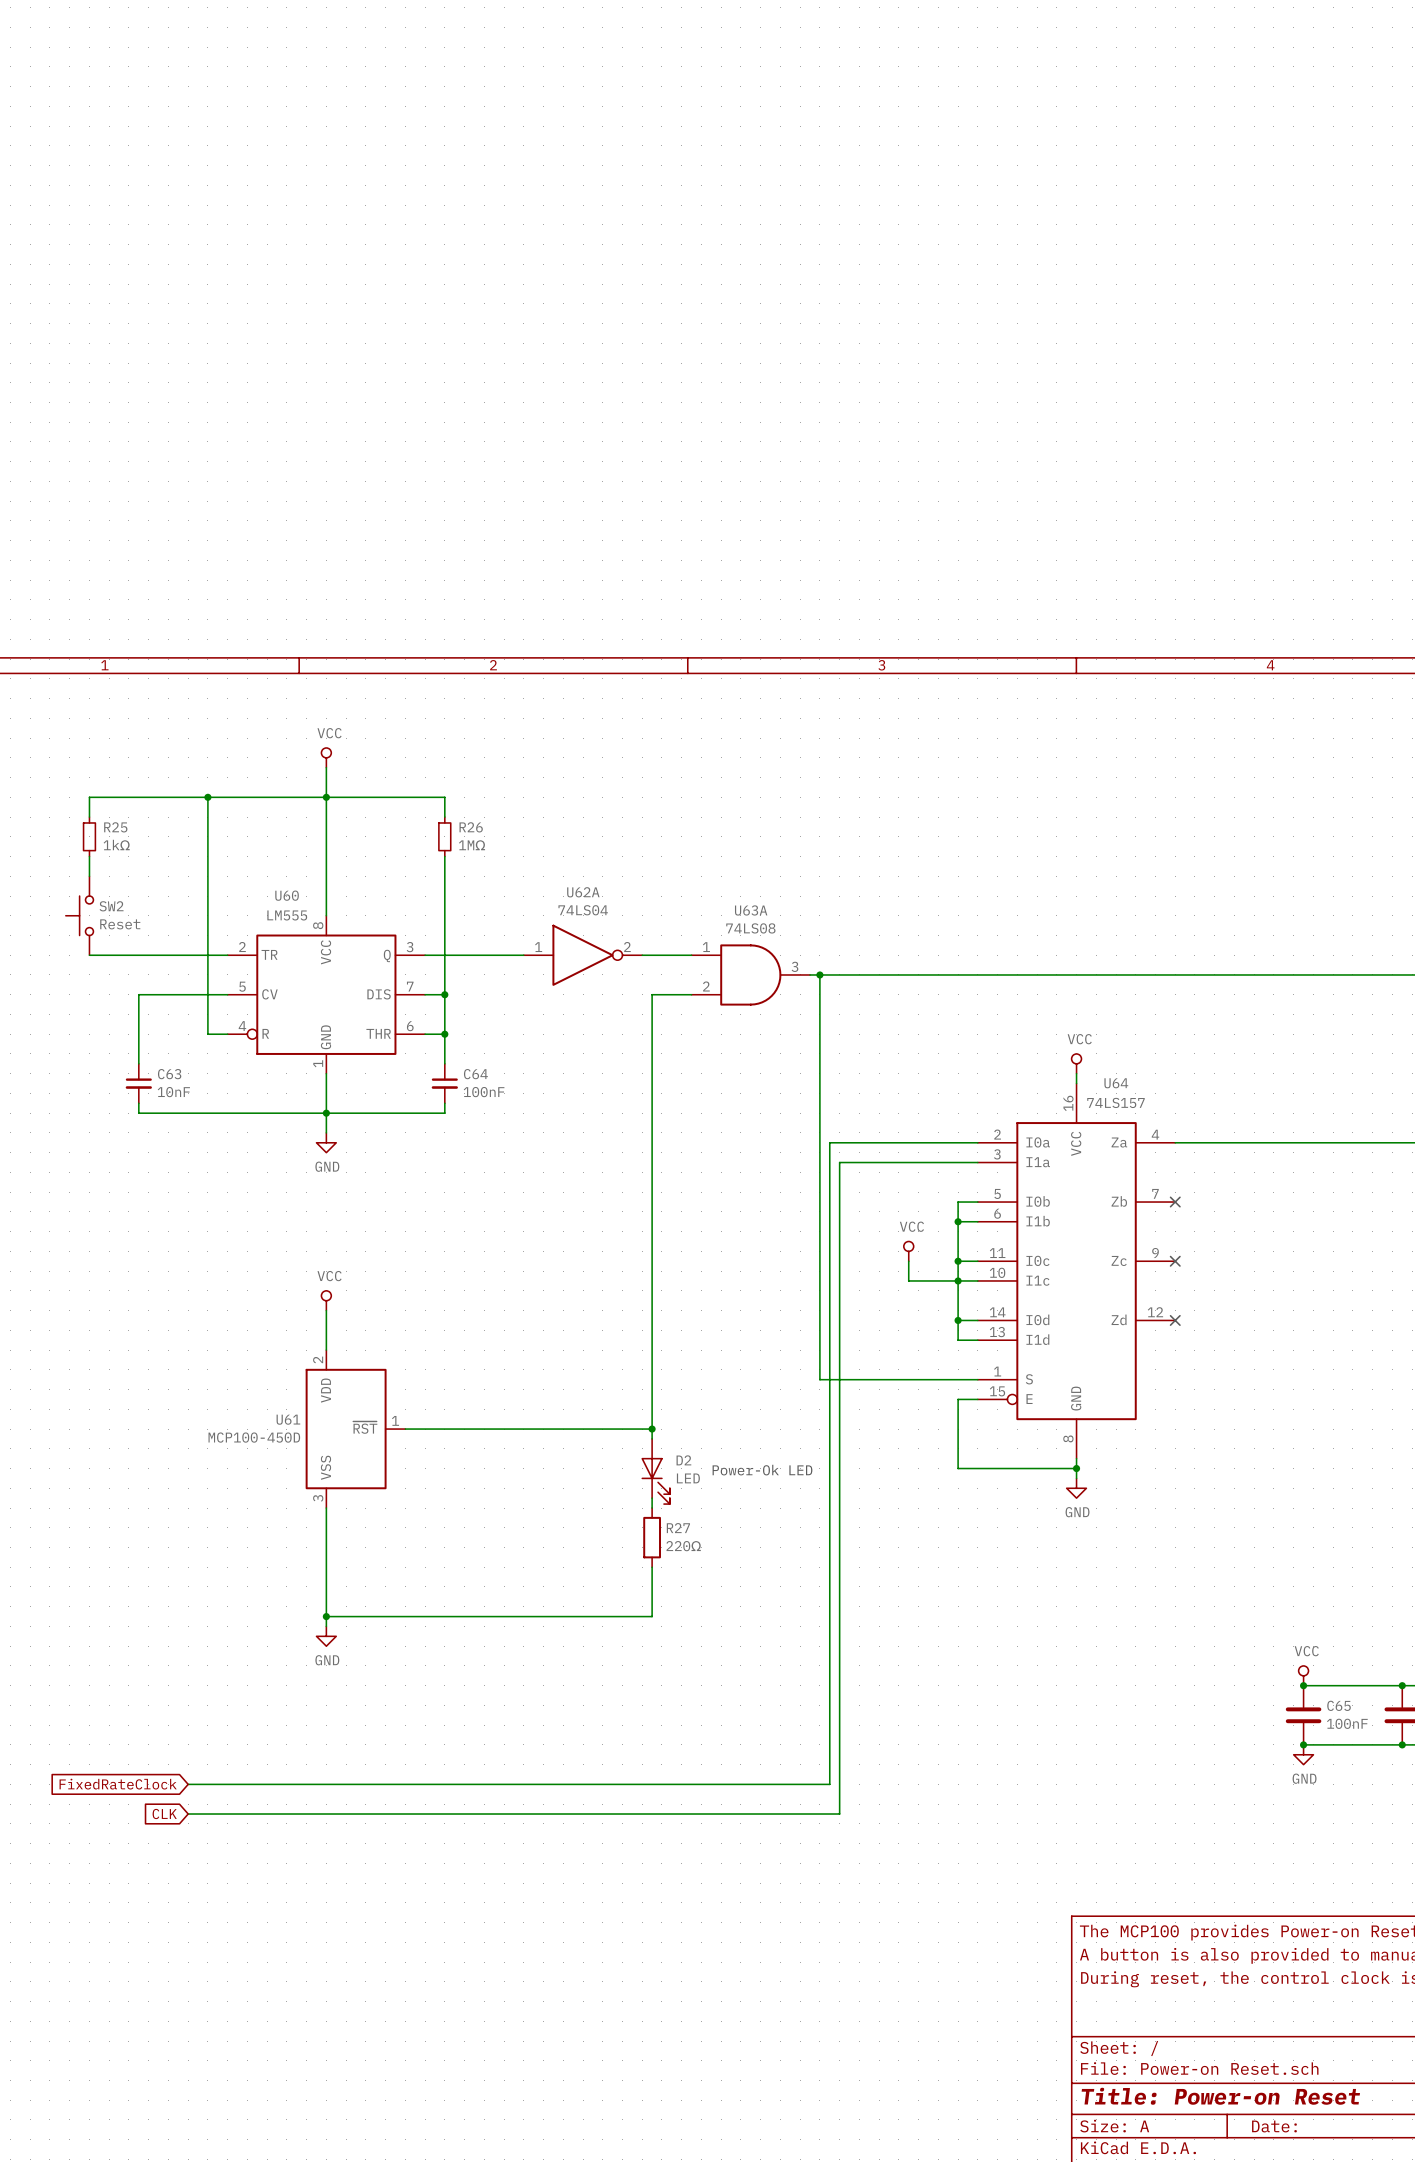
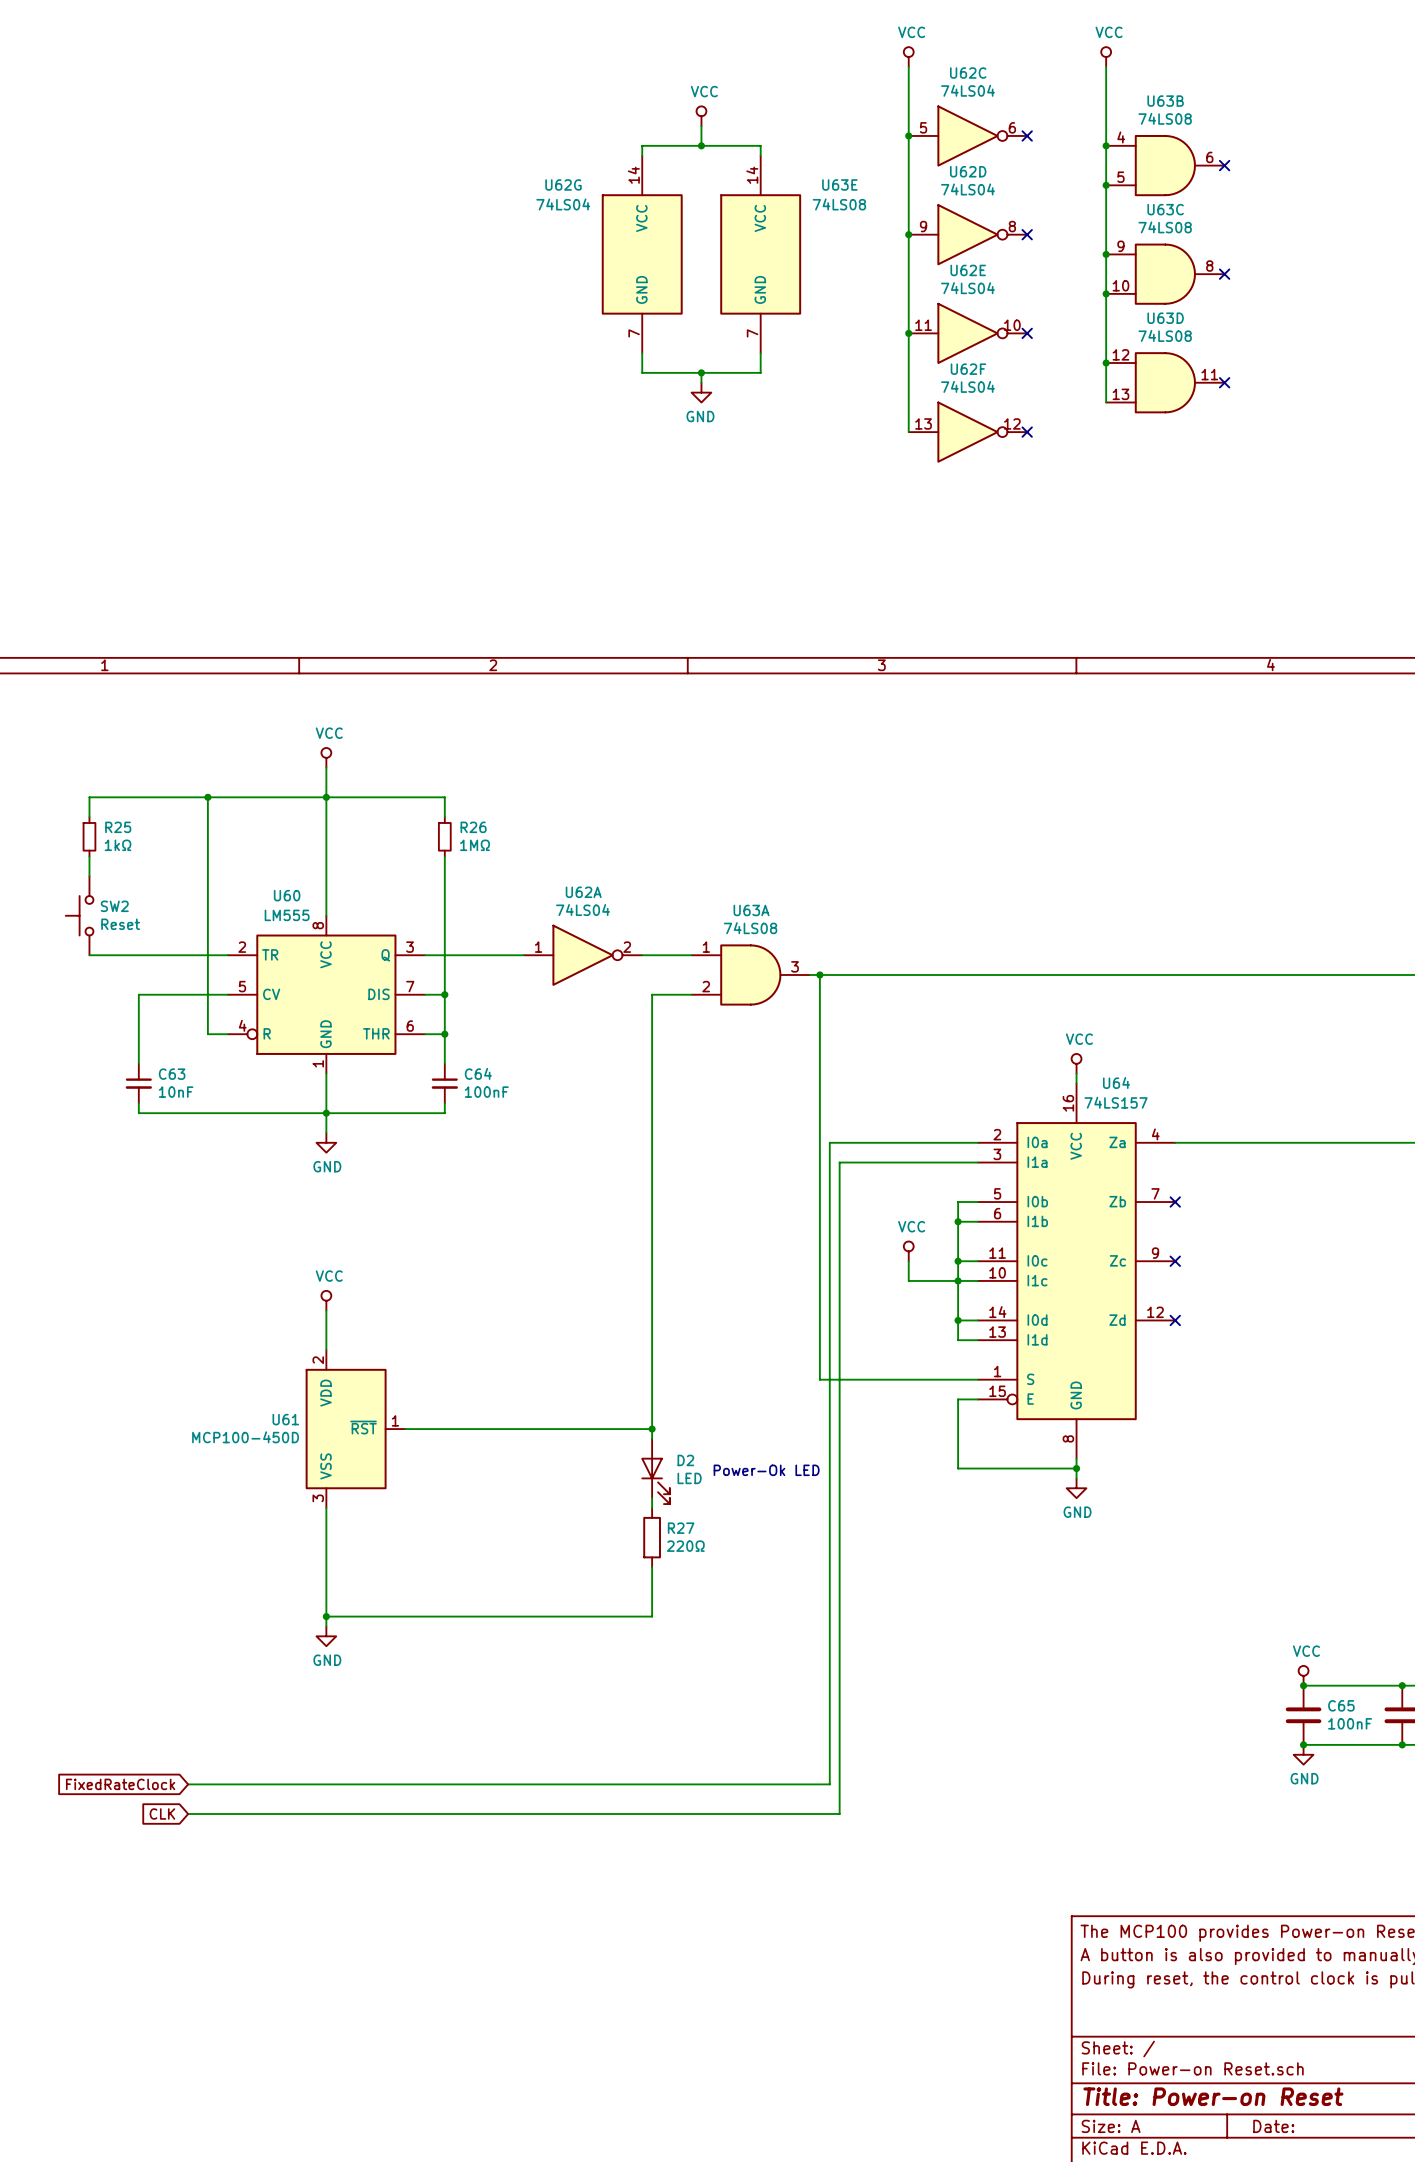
power symbol: none -> VCC (908, 57)
power symbol: none -> VCC (1106, 57)
wire: none -> (908, 66) (908, 432)
wire: none -> (1106, 66) (1106, 402)
power symbol: none -> VCC (701, 116)
wire: none -> (701, 126) (701, 145)
junction: none -> (908, 135)
U62C: none -> 74LS04 (967, 135)
no-connect mark: none -> (1027, 135)
junction: none -> (701, 145)
junction: none -> (1106, 145)
wire: none -> (642, 155) (642, 145) (760, 145) (760, 155)
U63B: none -> 74LS08 (1165, 165)
no-connect mark: none -> (1224, 165)
junction: none -> (1106, 185)
junction: none -> (908, 234)
U62D: none -> 74LS04 (967, 234)
no-connect mark: none -> (1027, 234)
U62G: none -> 74LS04 (642, 254)
U63E: none -> 74LS08 (760, 254)
junction: none -> (1106, 254)
U63C: none -> 74LS08 (1165, 274)
no-connect mark: none -> (1224, 274)
junction: none -> (1106, 293)
junction: none -> (908, 333)
U62E: none -> 74LS04 (967, 333)
no-connect mark: none -> (1027, 333)
wire: none -> (642, 353) (642, 372) (760, 372) (760, 353)
junction: none -> (1106, 363)
wire: none -> (701, 372) (701, 382)
junction: none -> (701, 372)
U63D: none -> 74LS08 (1165, 382)
no-connect mark: none -> (1224, 382)
power symbol: none -> GND (701, 392)
U62F: none -> 74LS04 (967, 432)
no-connect mark: none -> (1027, 432)

